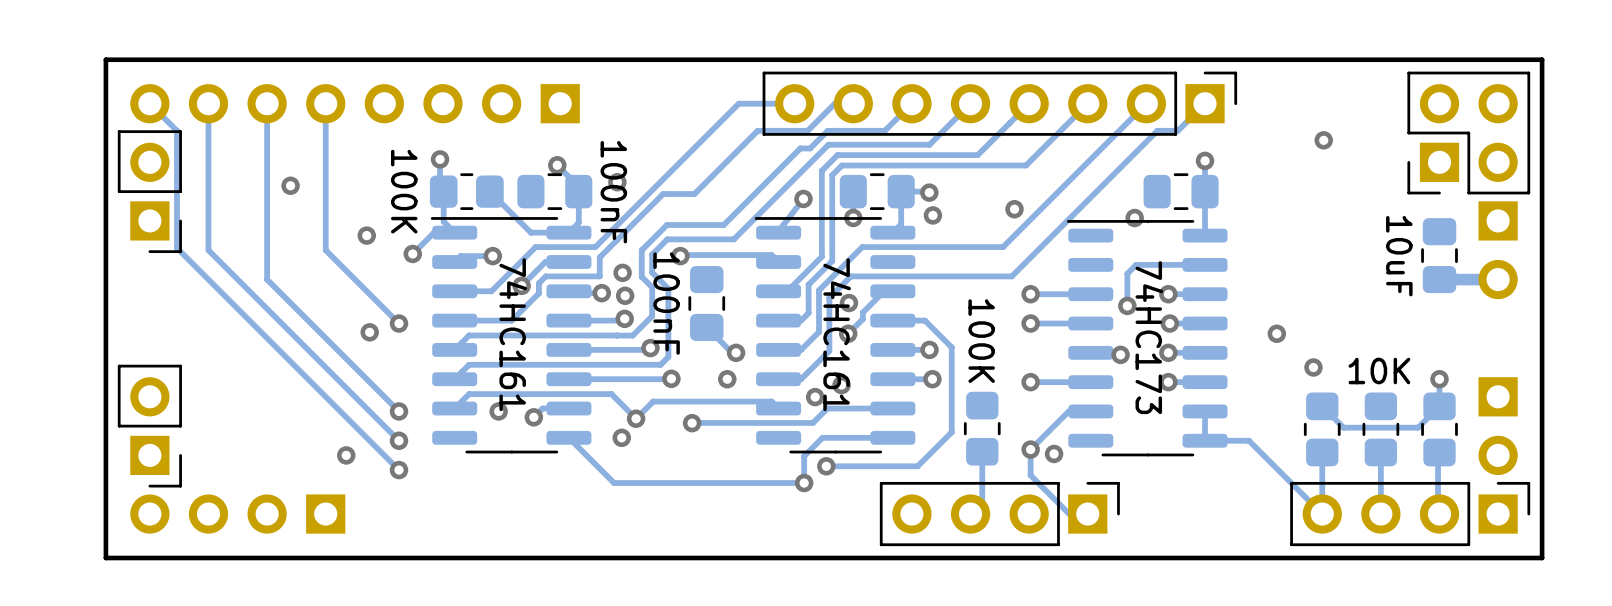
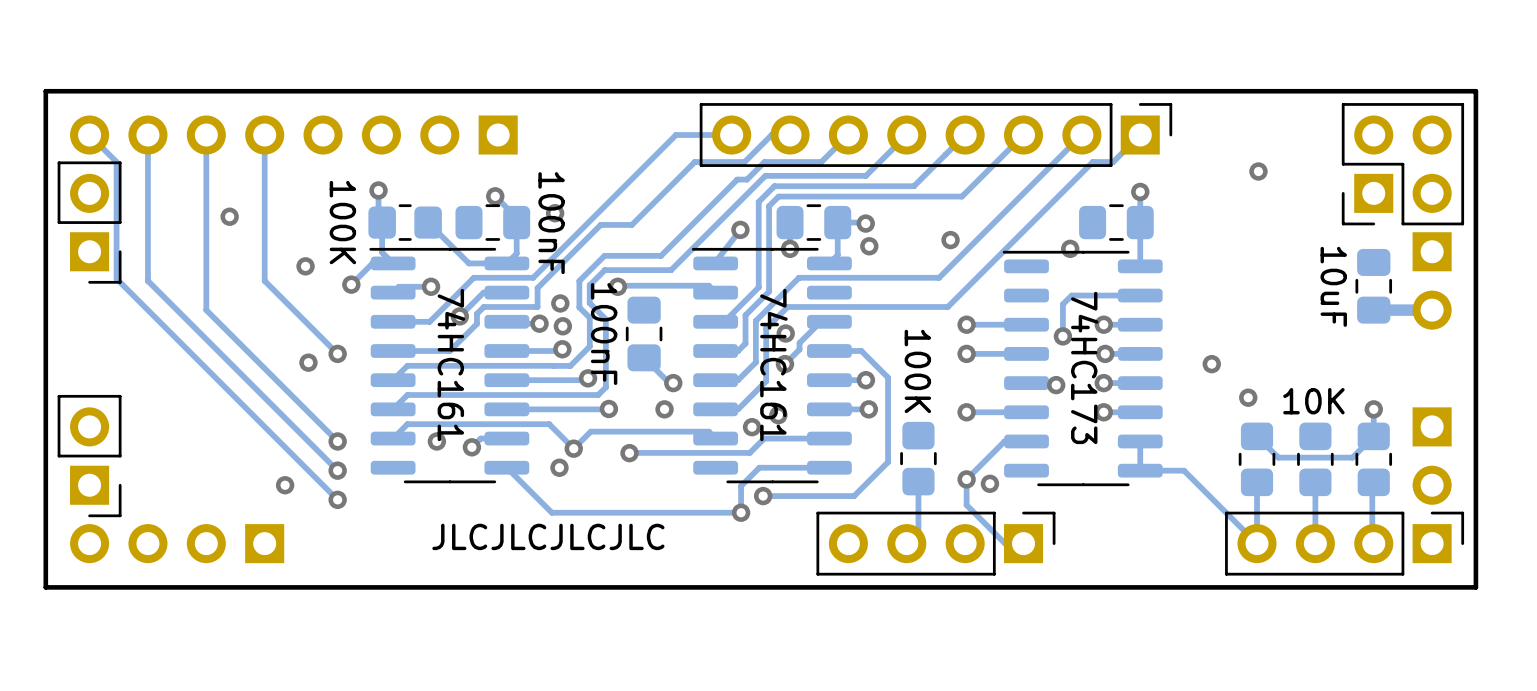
text: none -> JLCJLCJLCJLC (548, 536)

